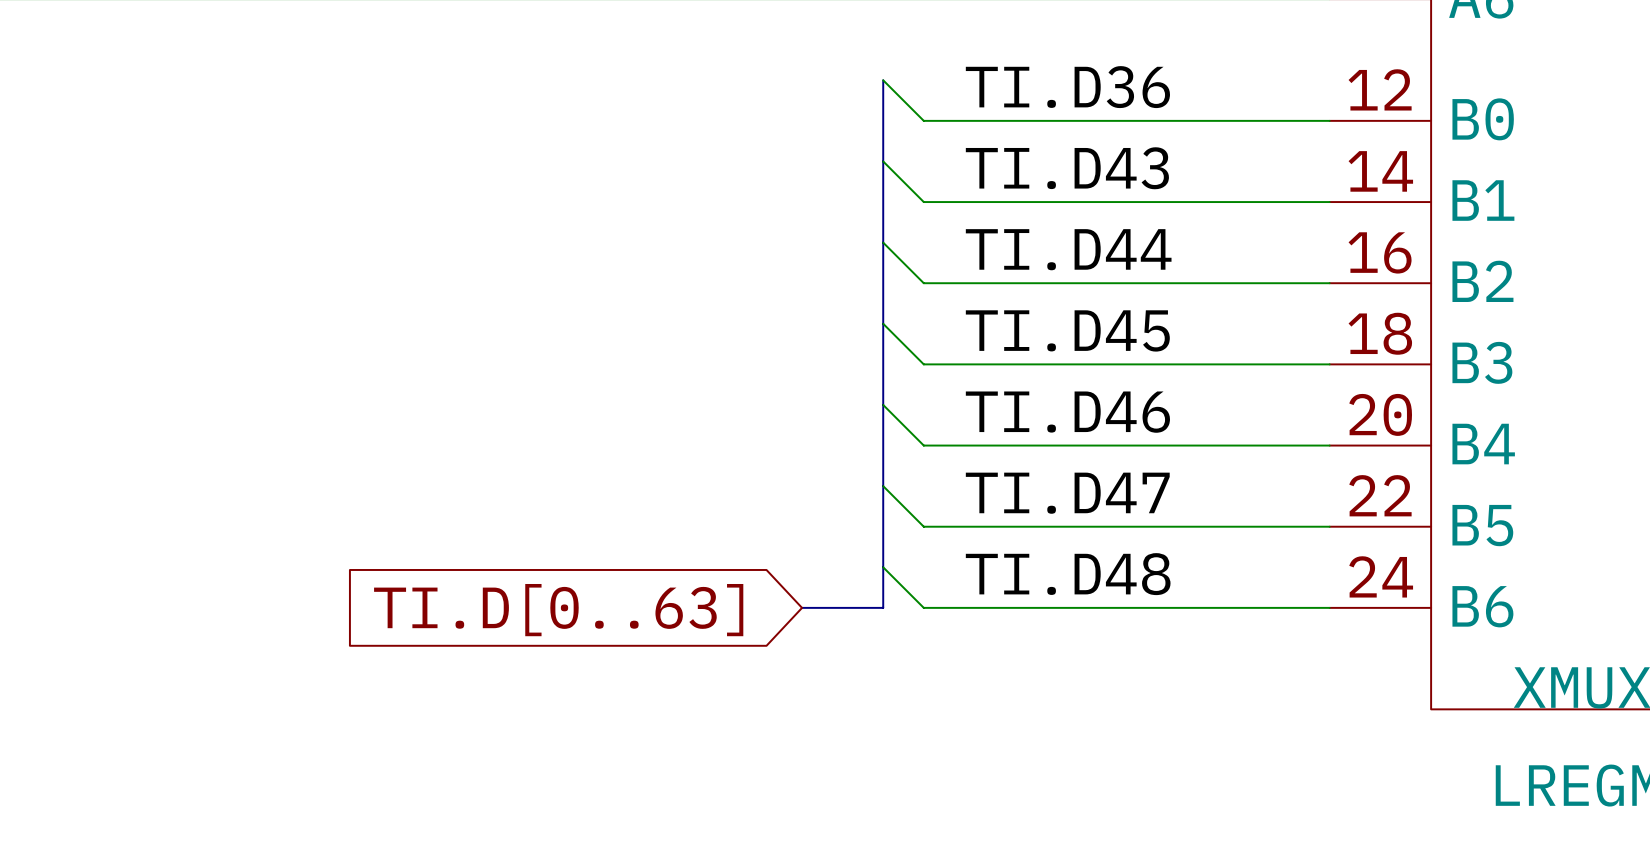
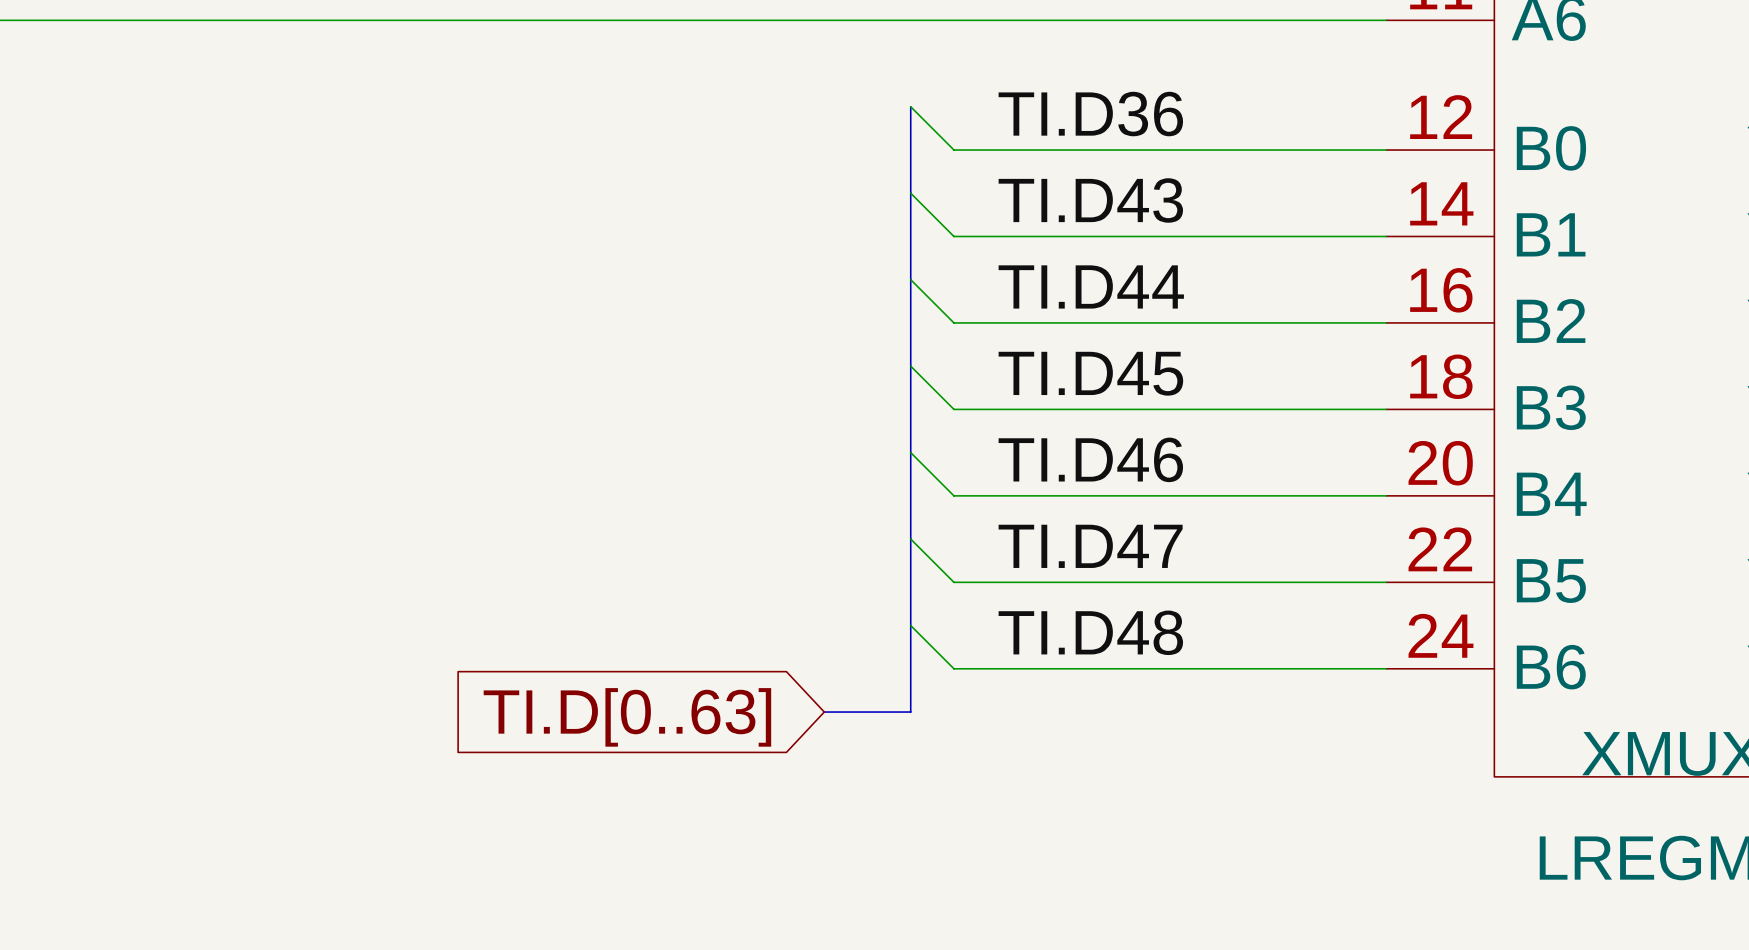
bus: (802, 607) (883, 607) -> (824, 712) (910, 712) (910, 668)
global label position: TI.D[0..63] (558, 610) -> TI.D[0..63] (627, 717)

